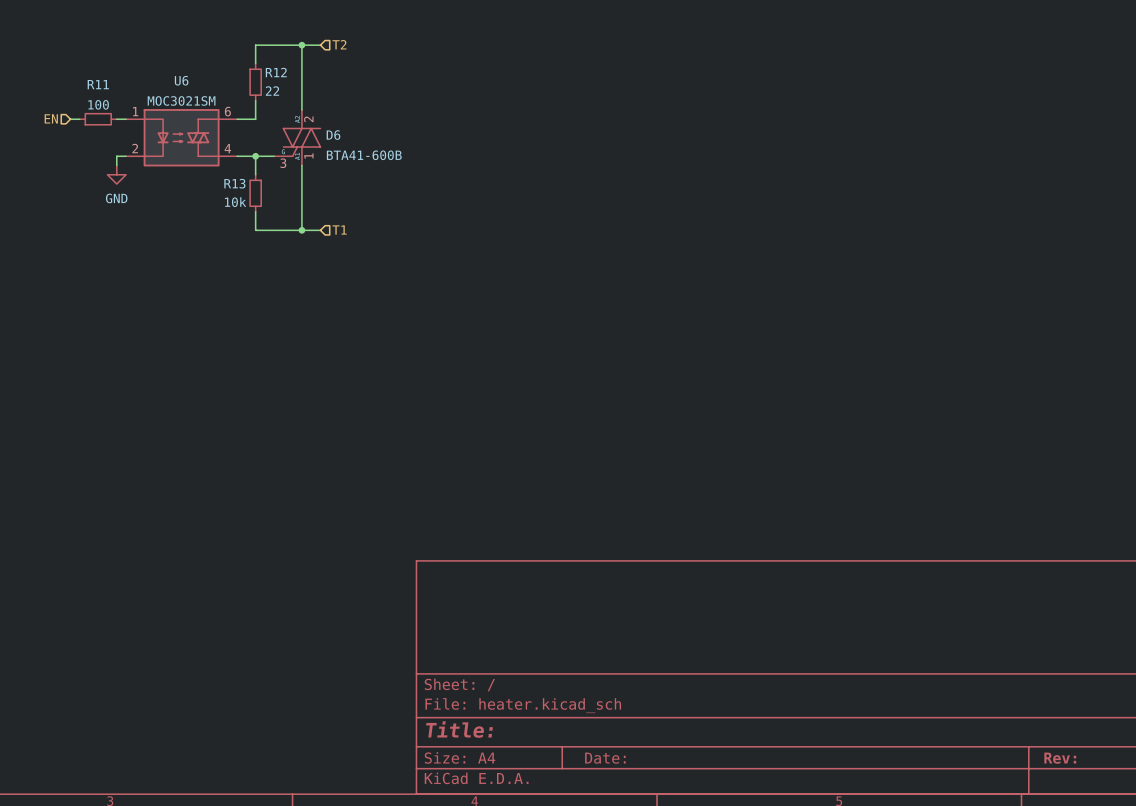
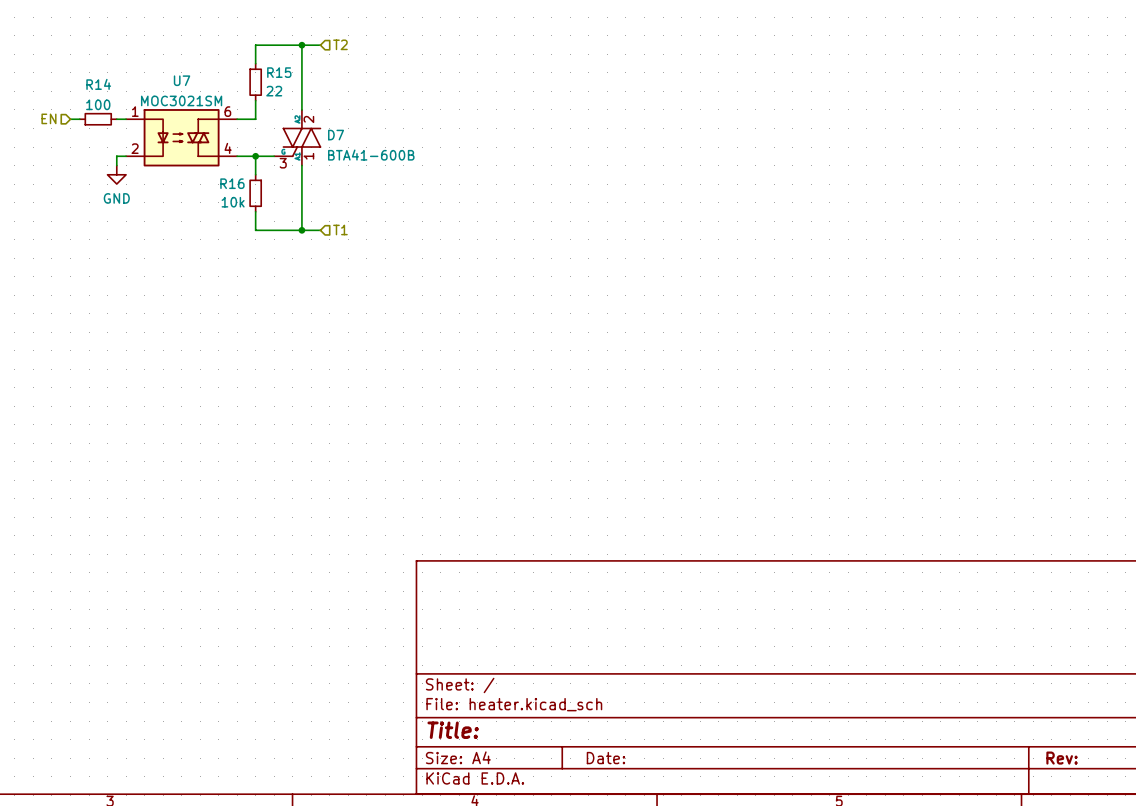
R12 name: R12 (276, 72) -> R15 (279, 72)
U6 name: U6 (181, 80) -> U7 (182, 80)
R11 name: R11 (98, 84) -> R14 (98, 84)
D6 name: D6 (333, 135) -> D7 (336, 135)
R13 name: R13 (234, 183) -> R16 (232, 183)

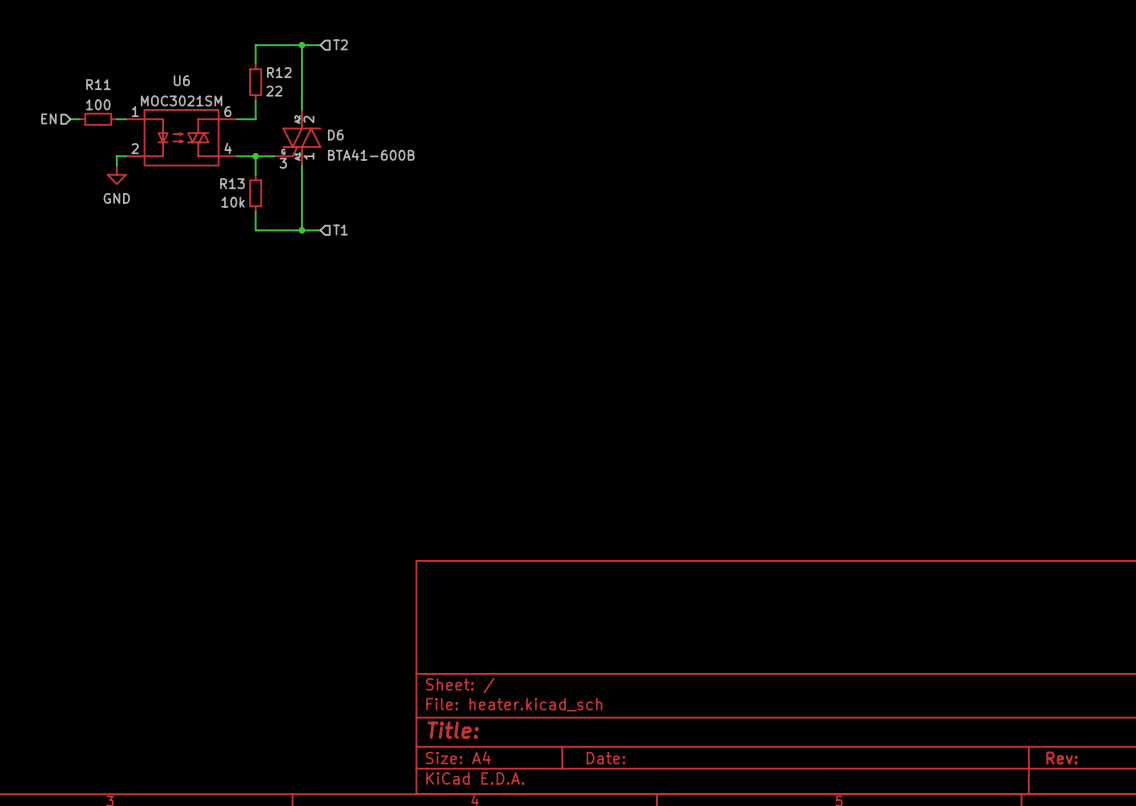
R15 name: R15 (279, 72) -> R12 (279, 72)
U7 name: U7 (182, 80) -> U6 (181, 80)
R14 name: R14 (98, 84) -> R11 (98, 84)
D7 name: D7 (336, 135) -> D6 (335, 135)
R16 name: R16 (232, 183) -> R13 (232, 183)

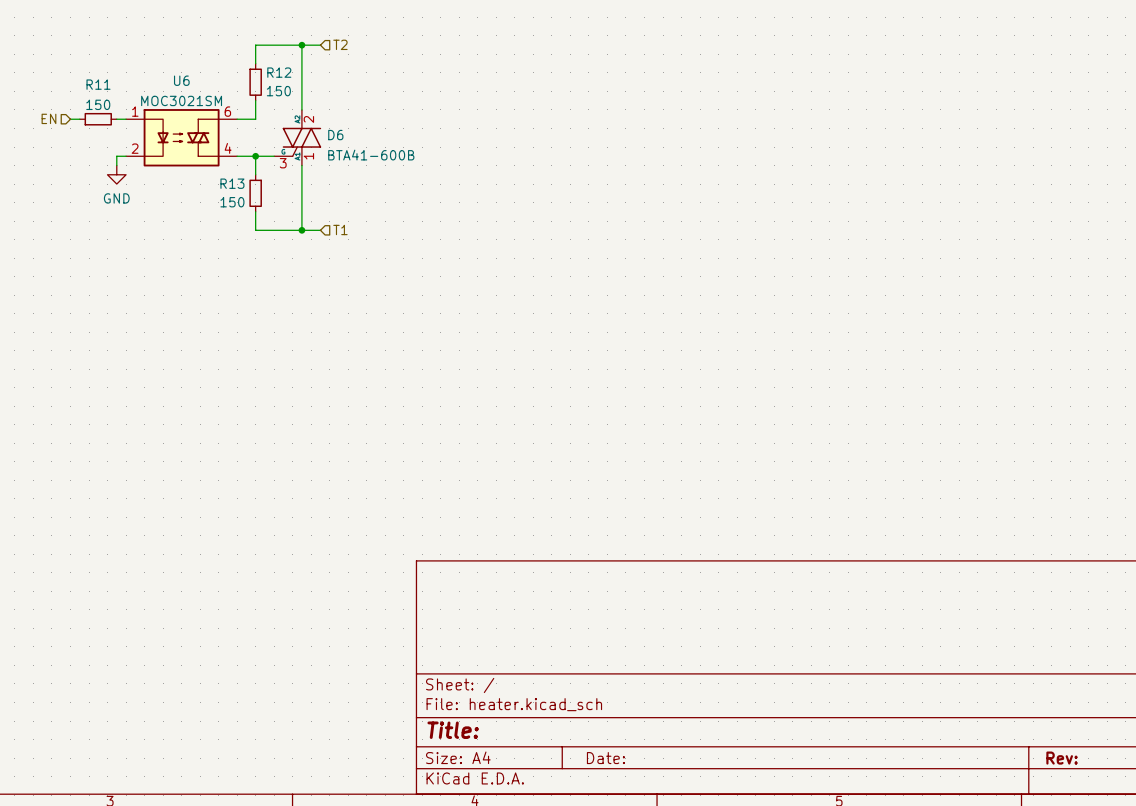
R12 value: 22 (274, 91) -> 150 (278, 91)
R11 value: 100 (98, 104) -> 150 (98, 104)
R13 value: 10k (233, 202) -> 150 (232, 202)

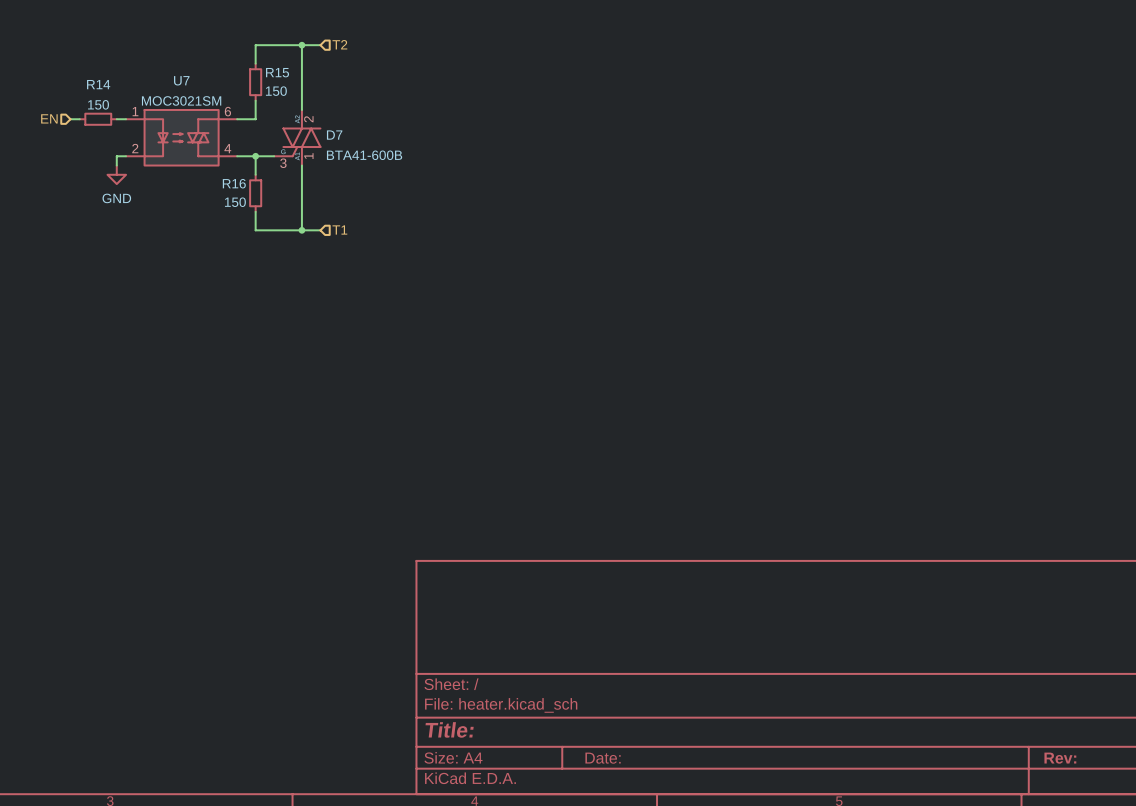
R12 name: R12 (279, 72) -> R15 (277, 72)
U6 name: U6 (181, 80) -> U7 (181, 80)
R11 name: R11 (98, 84) -> R14 (98, 84)
D6 name: D6 (335, 135) -> D7 (334, 135)
R13 name: R13 (232, 183) -> R16 (234, 183)

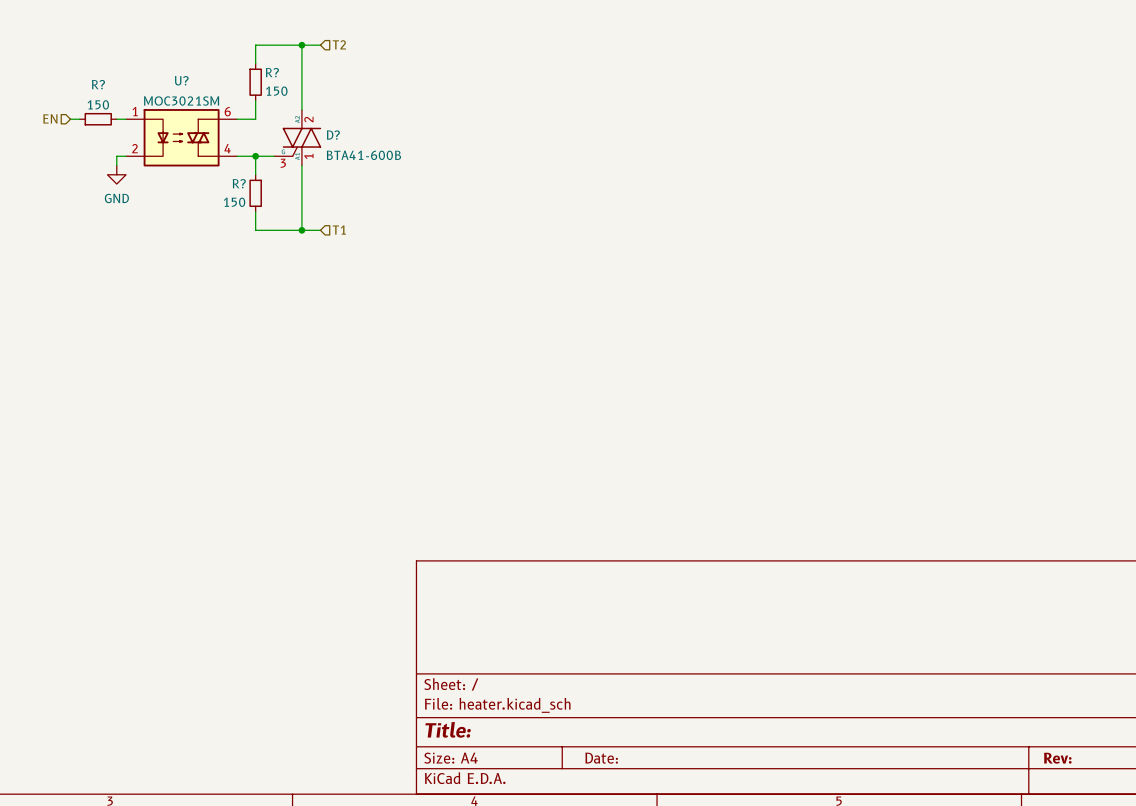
R15 name: R15 (277, 72) -> R? (272, 72)
U7 name: U7 (181, 80) -> U? (181, 80)
R14 name: R14 (98, 84) -> R? (98, 84)
D7 name: D7 (334, 135) -> D? (333, 135)
R16 name: R16 (234, 183) -> R? (239, 183)

